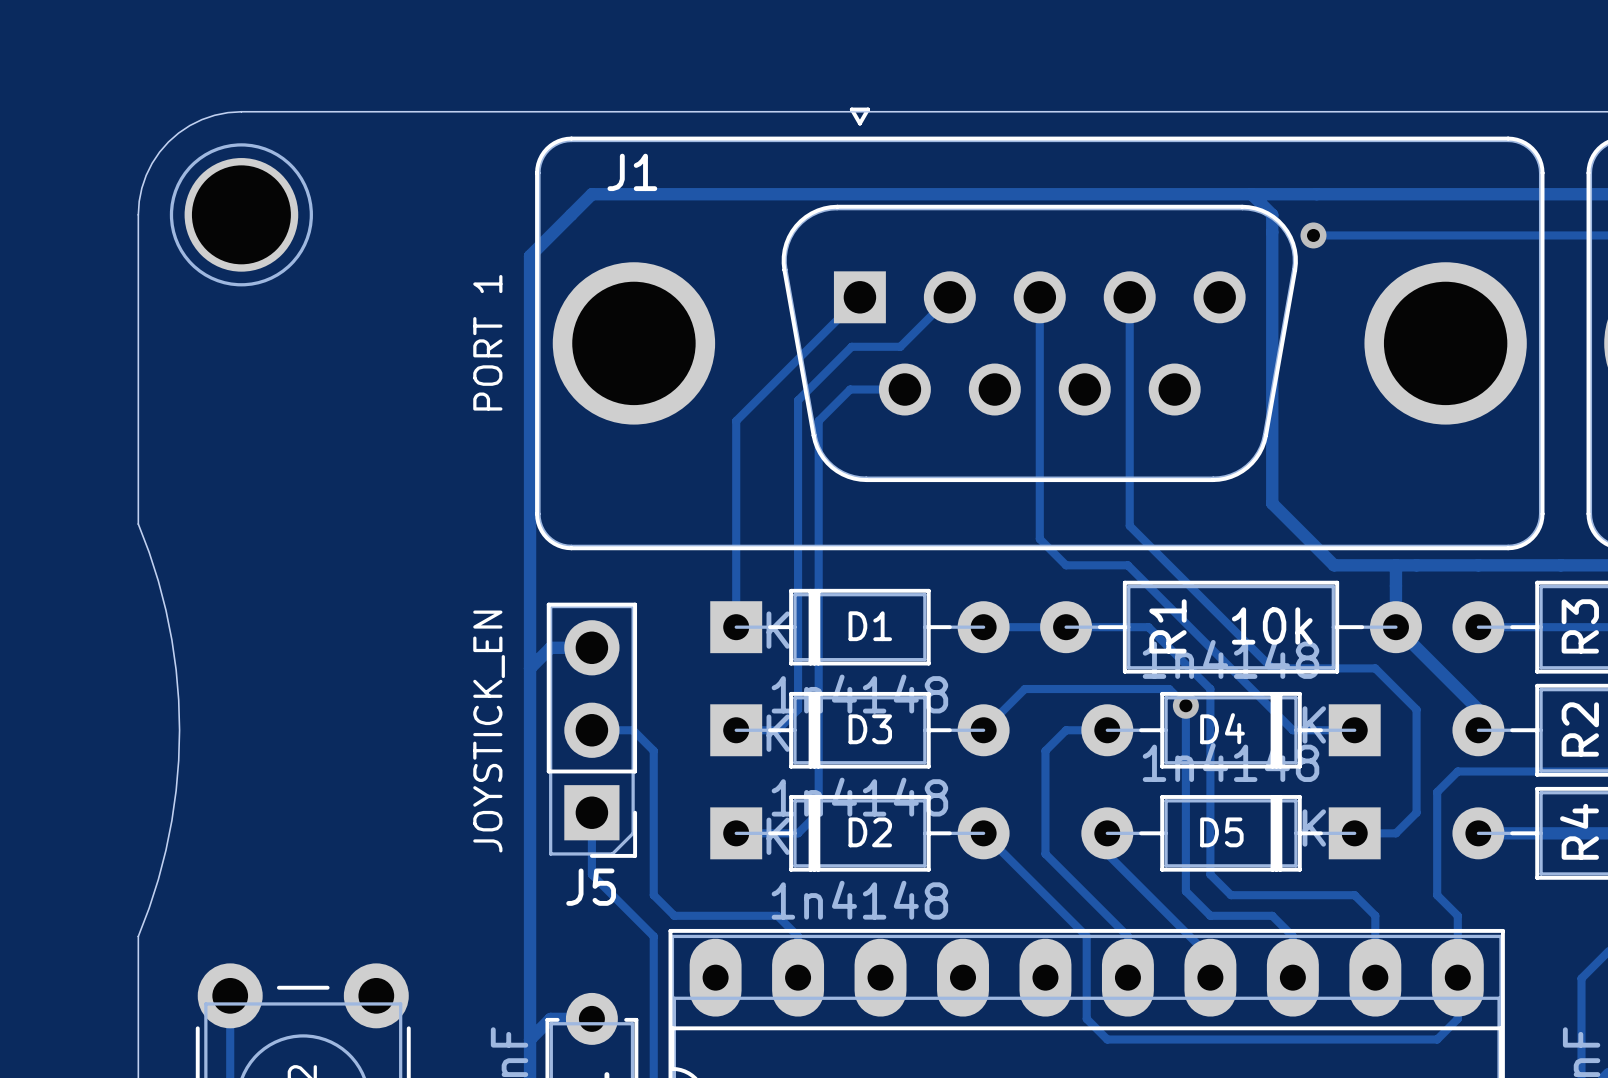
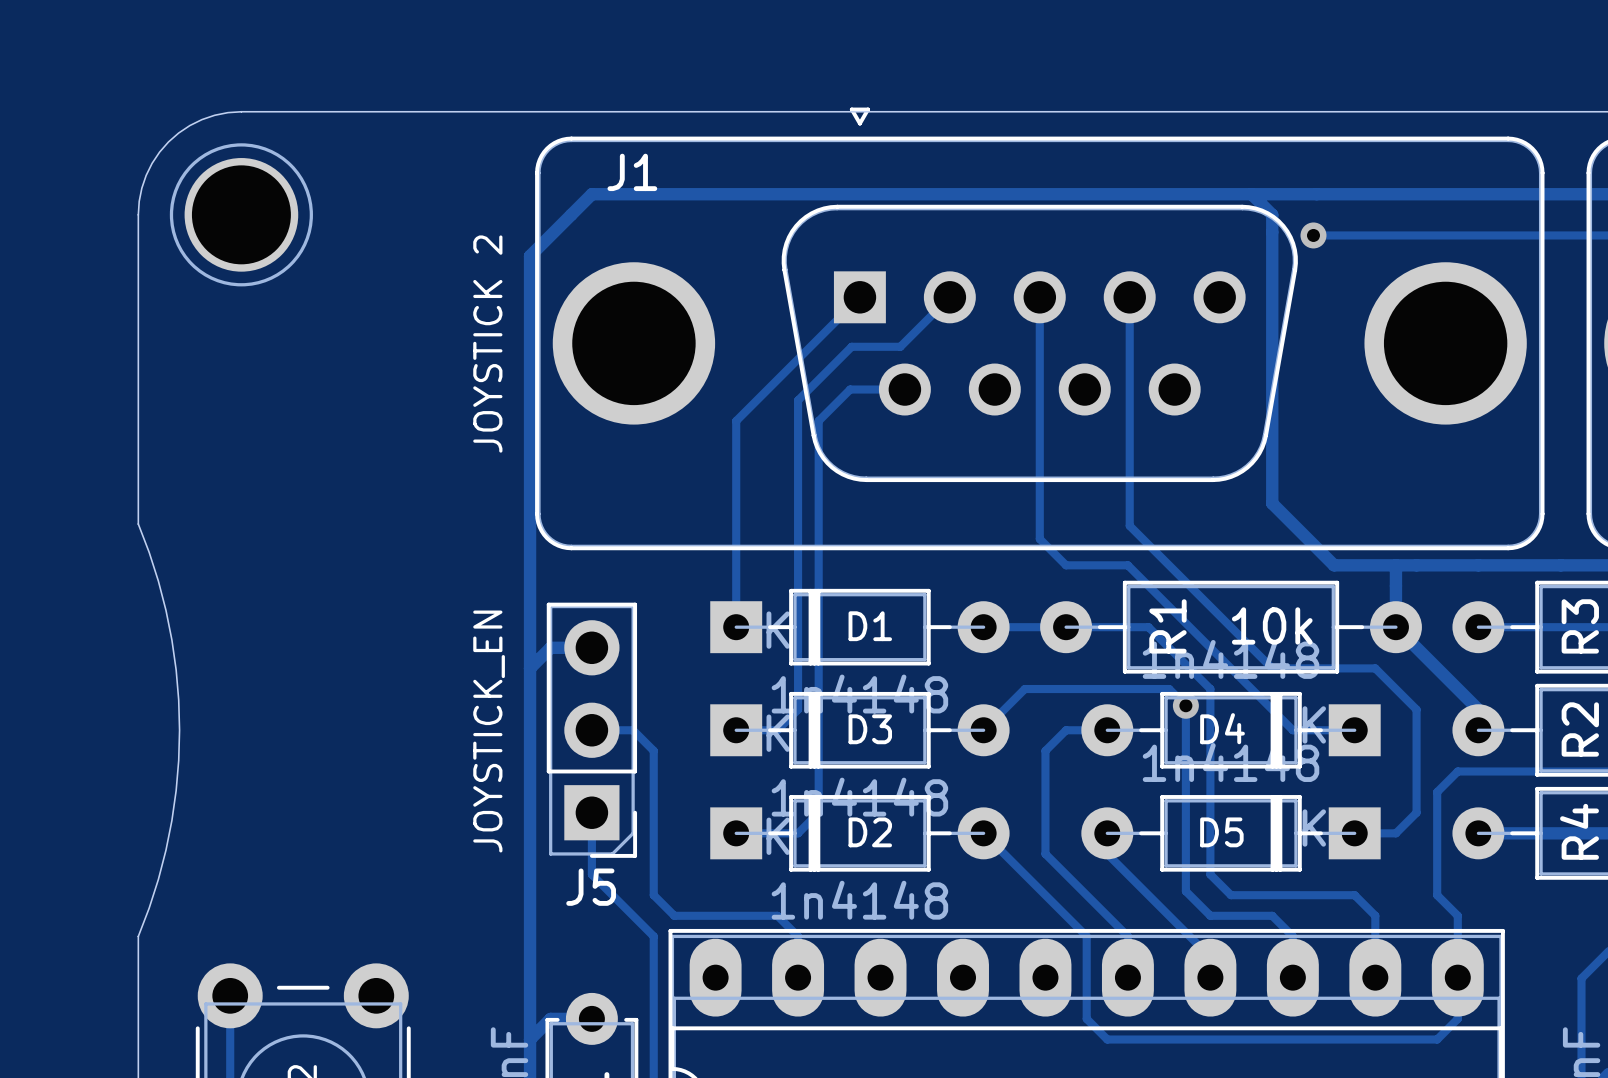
J1 value: PORT 1 (487, 342) -> JOYSTICK 2 (487, 344)

